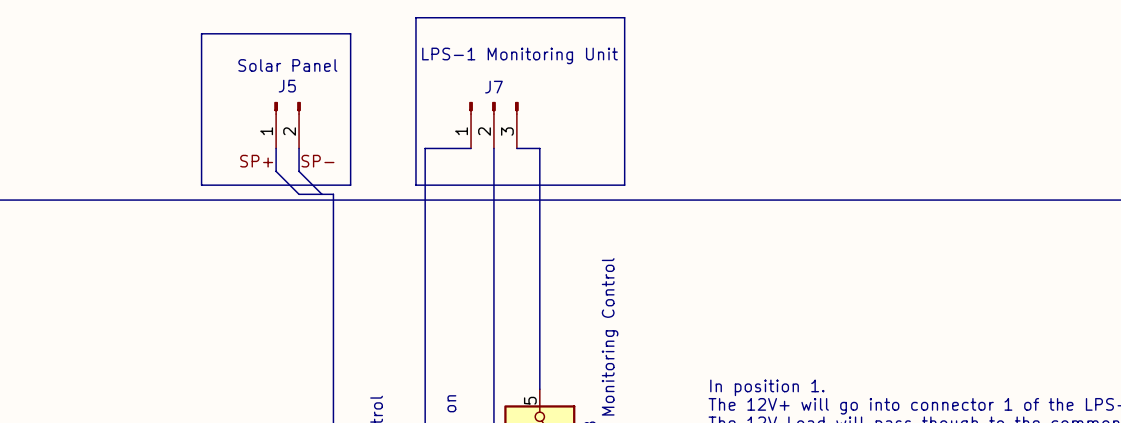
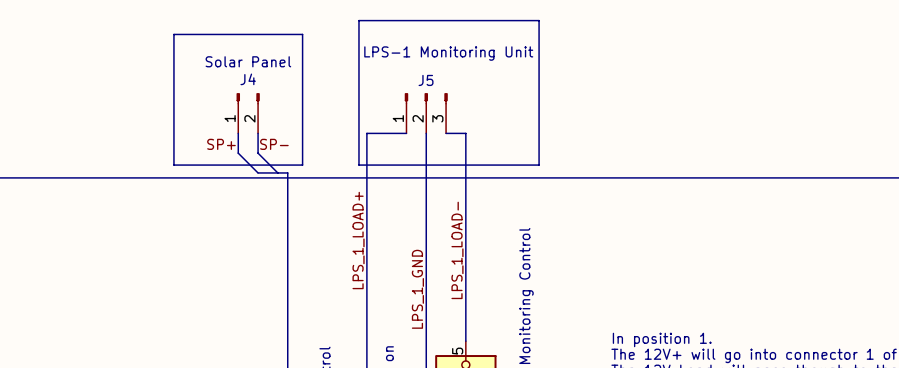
J5 name: J5 (287, 86) -> J4 (248, 79)
J7 name: J7 (493, 87) -> J5 (426, 80)
label: none -> LPS_1_LOAD+ (358, 240)
label: none -> LPS_1_LOAD- (457, 250)
label: none -> LPS_1_GND (417, 289)

